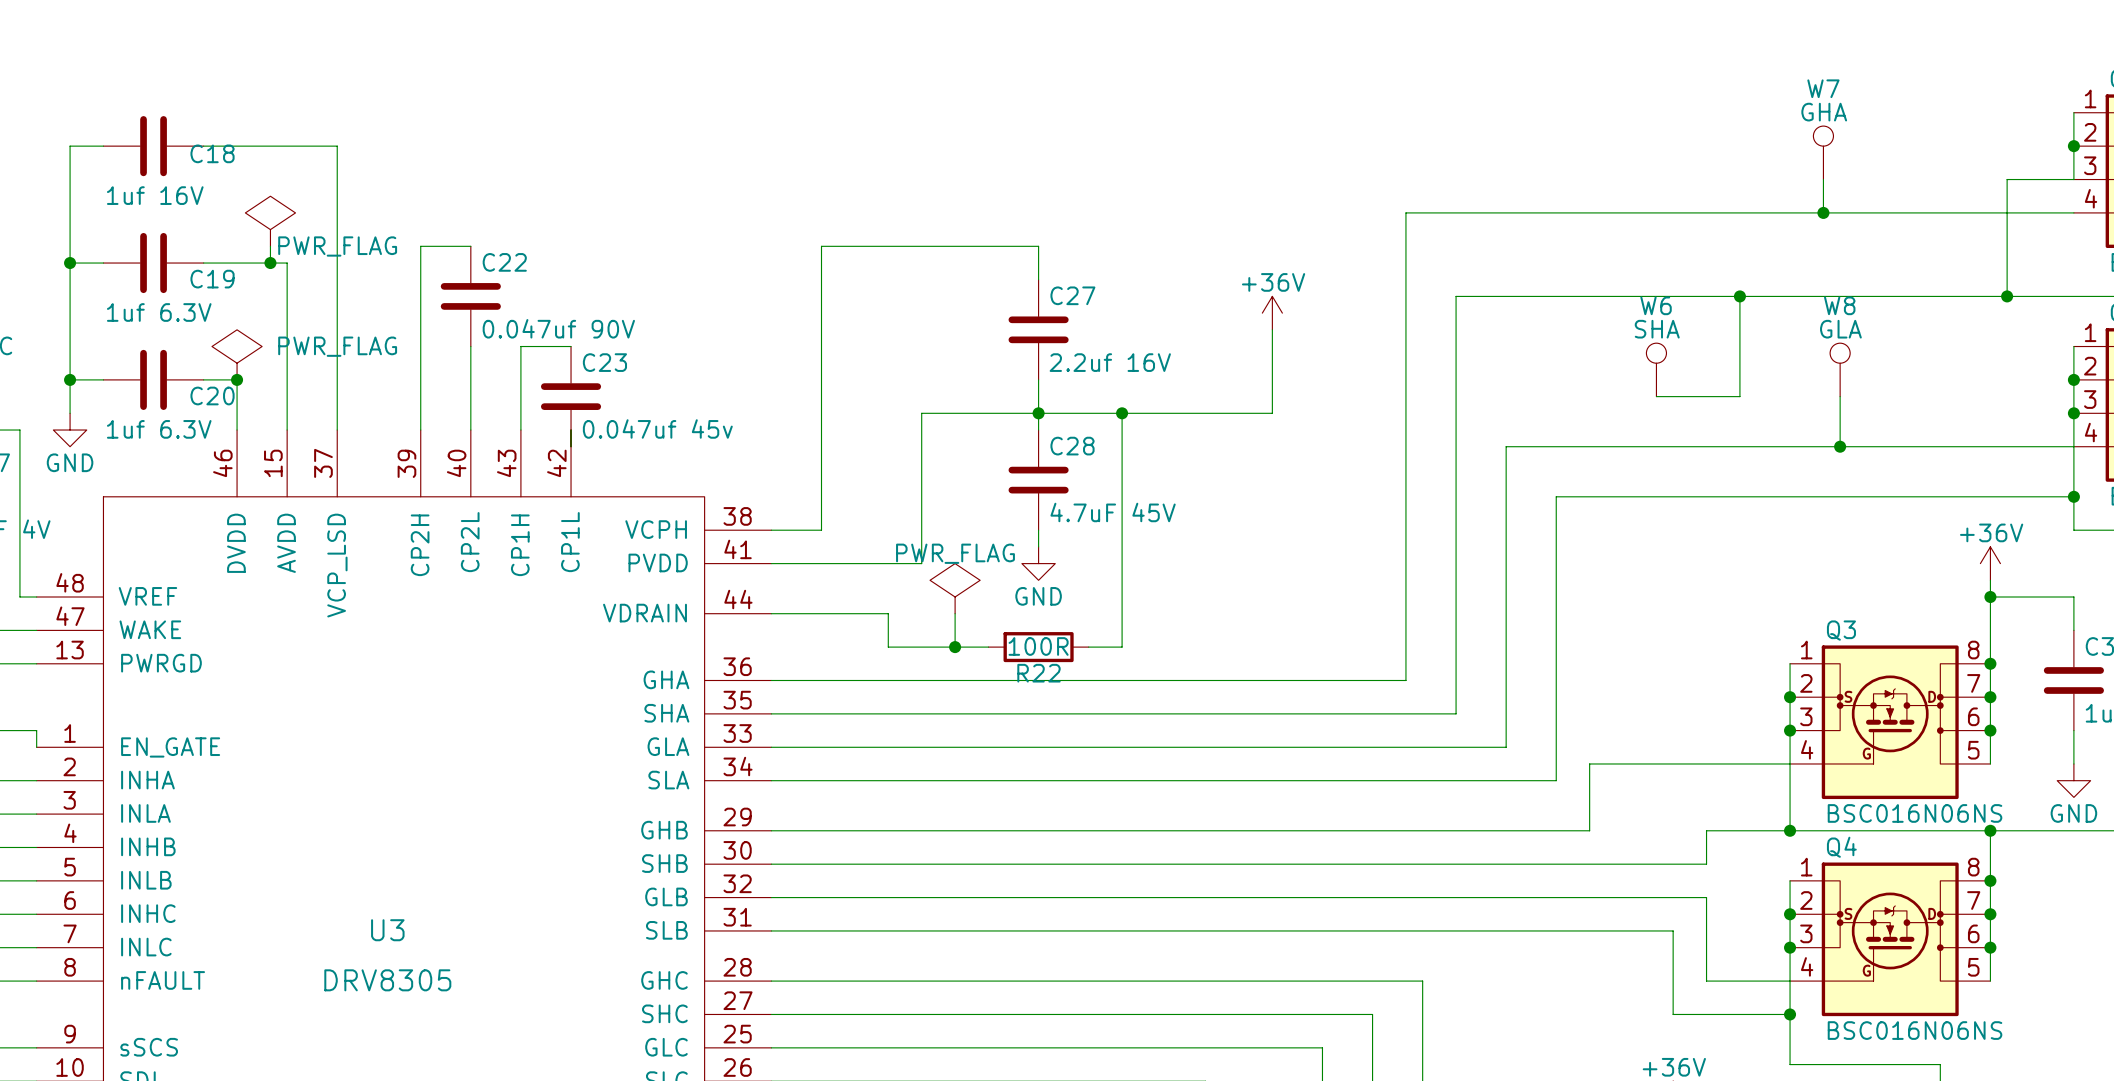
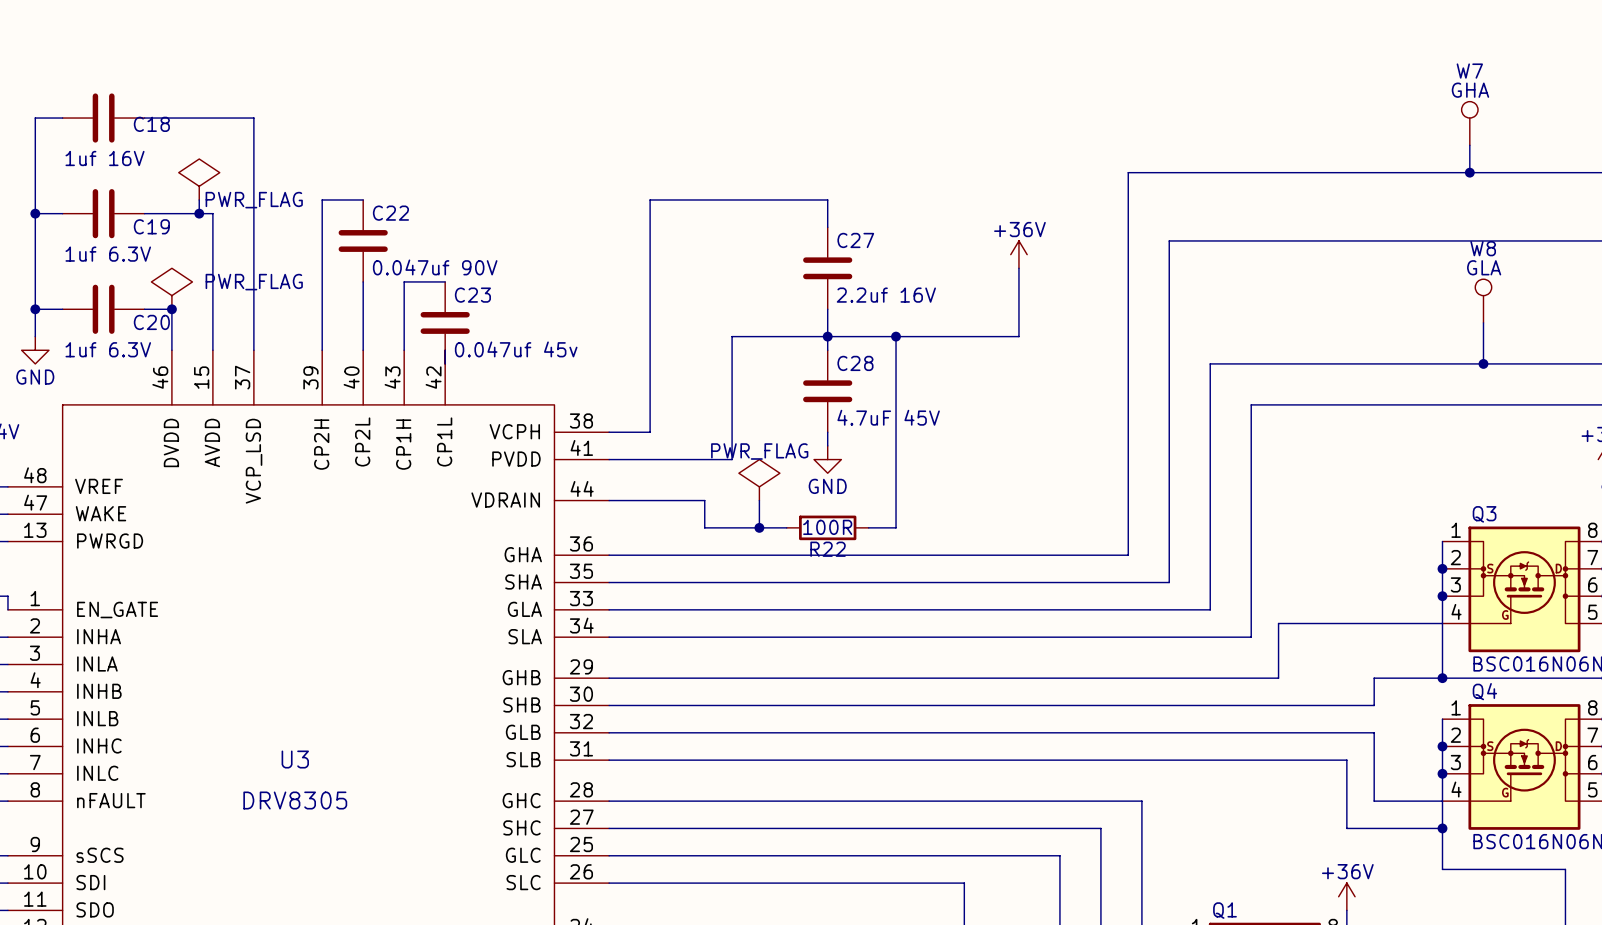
wire: (1739, 296) (1739, 396) (1656, 396) -> none
junction: (1739, 296) -> none
W6: SHA (1656, 369) -> none

